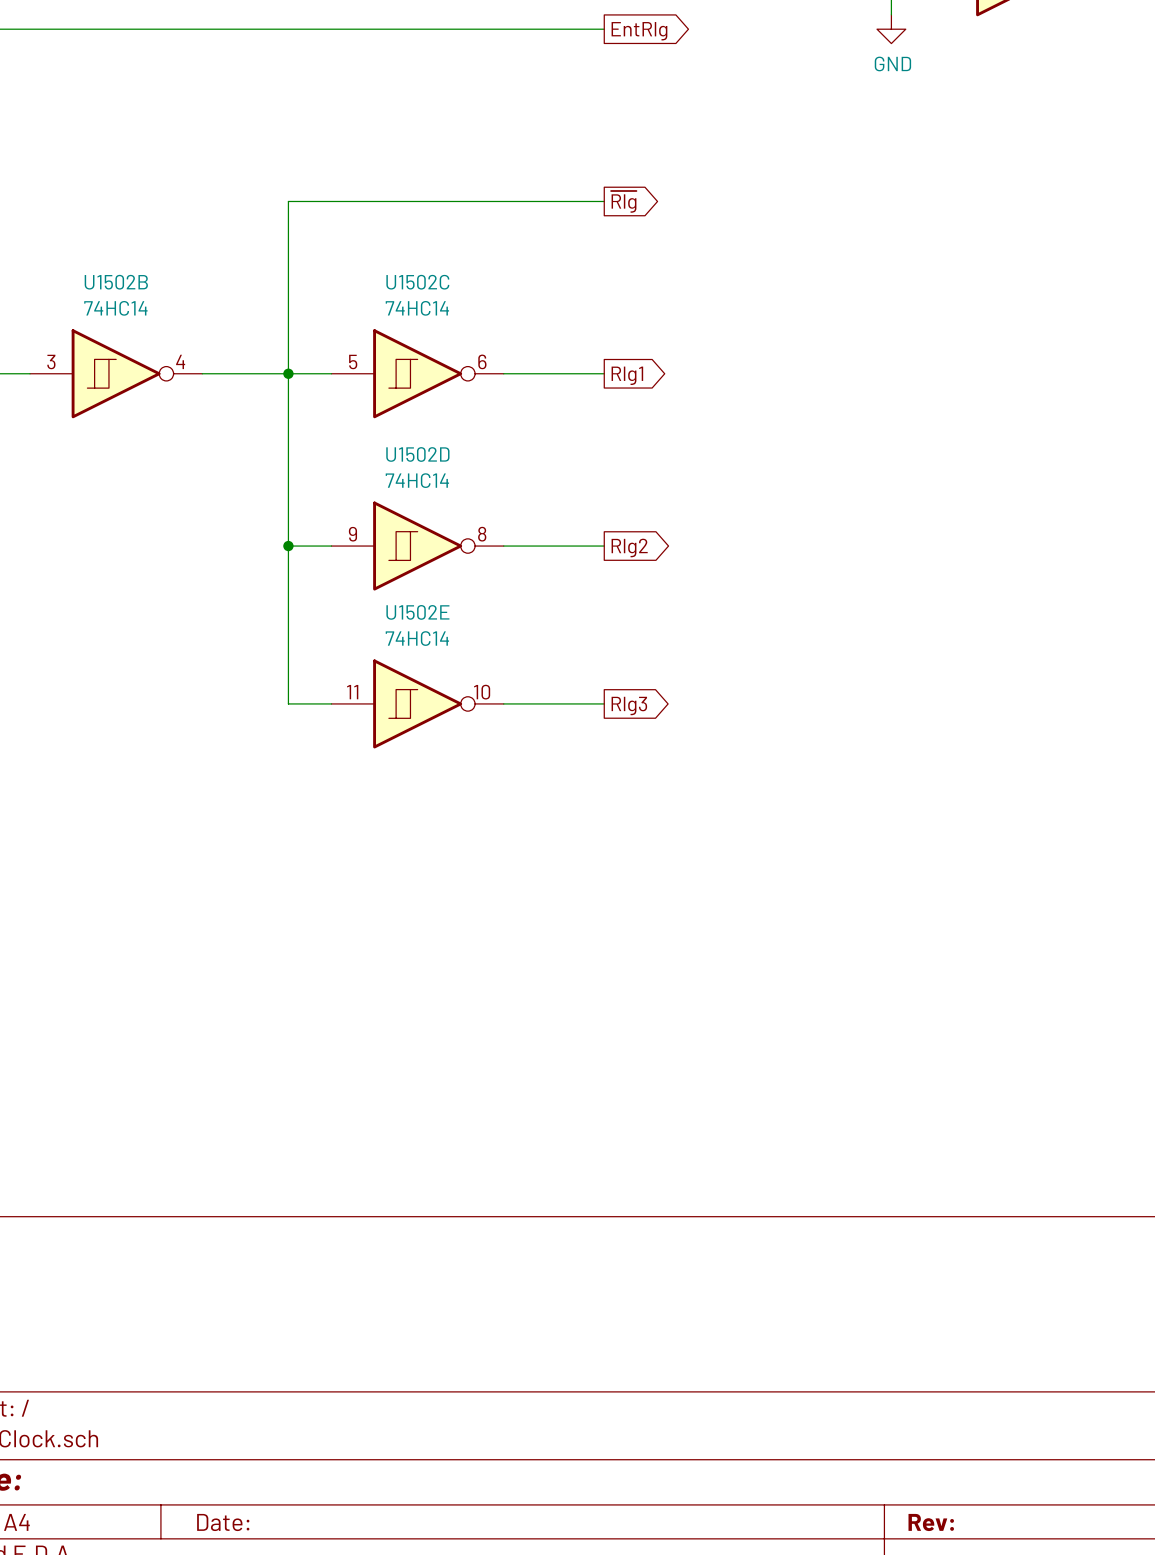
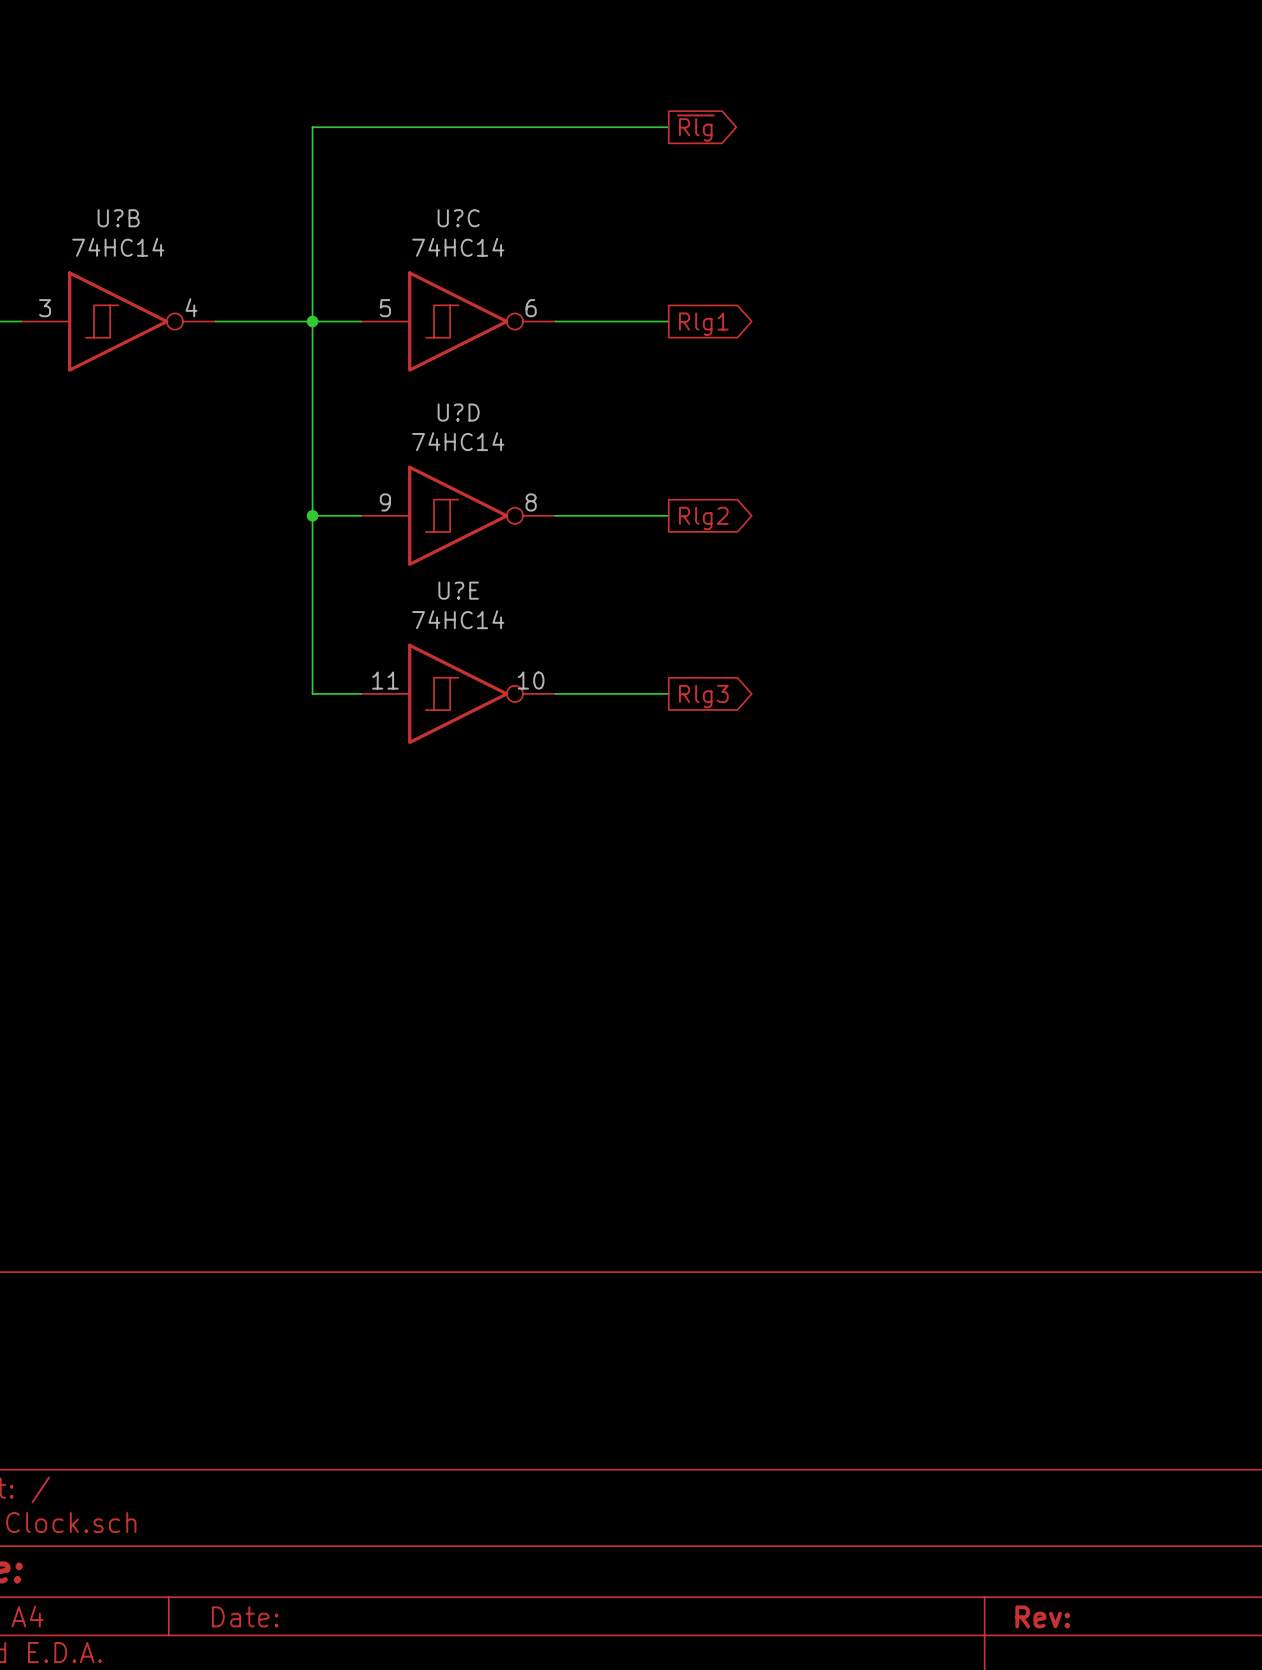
U1502B name: U1502B (116, 282) -> U?B (118, 218)
U1502C name: U1502C (417, 282) -> U?C (458, 218)
U1502D name: U1502D (417, 454) -> U?D (458, 412)
U1502E name: U1502E (417, 612) -> U?E (458, 590)

